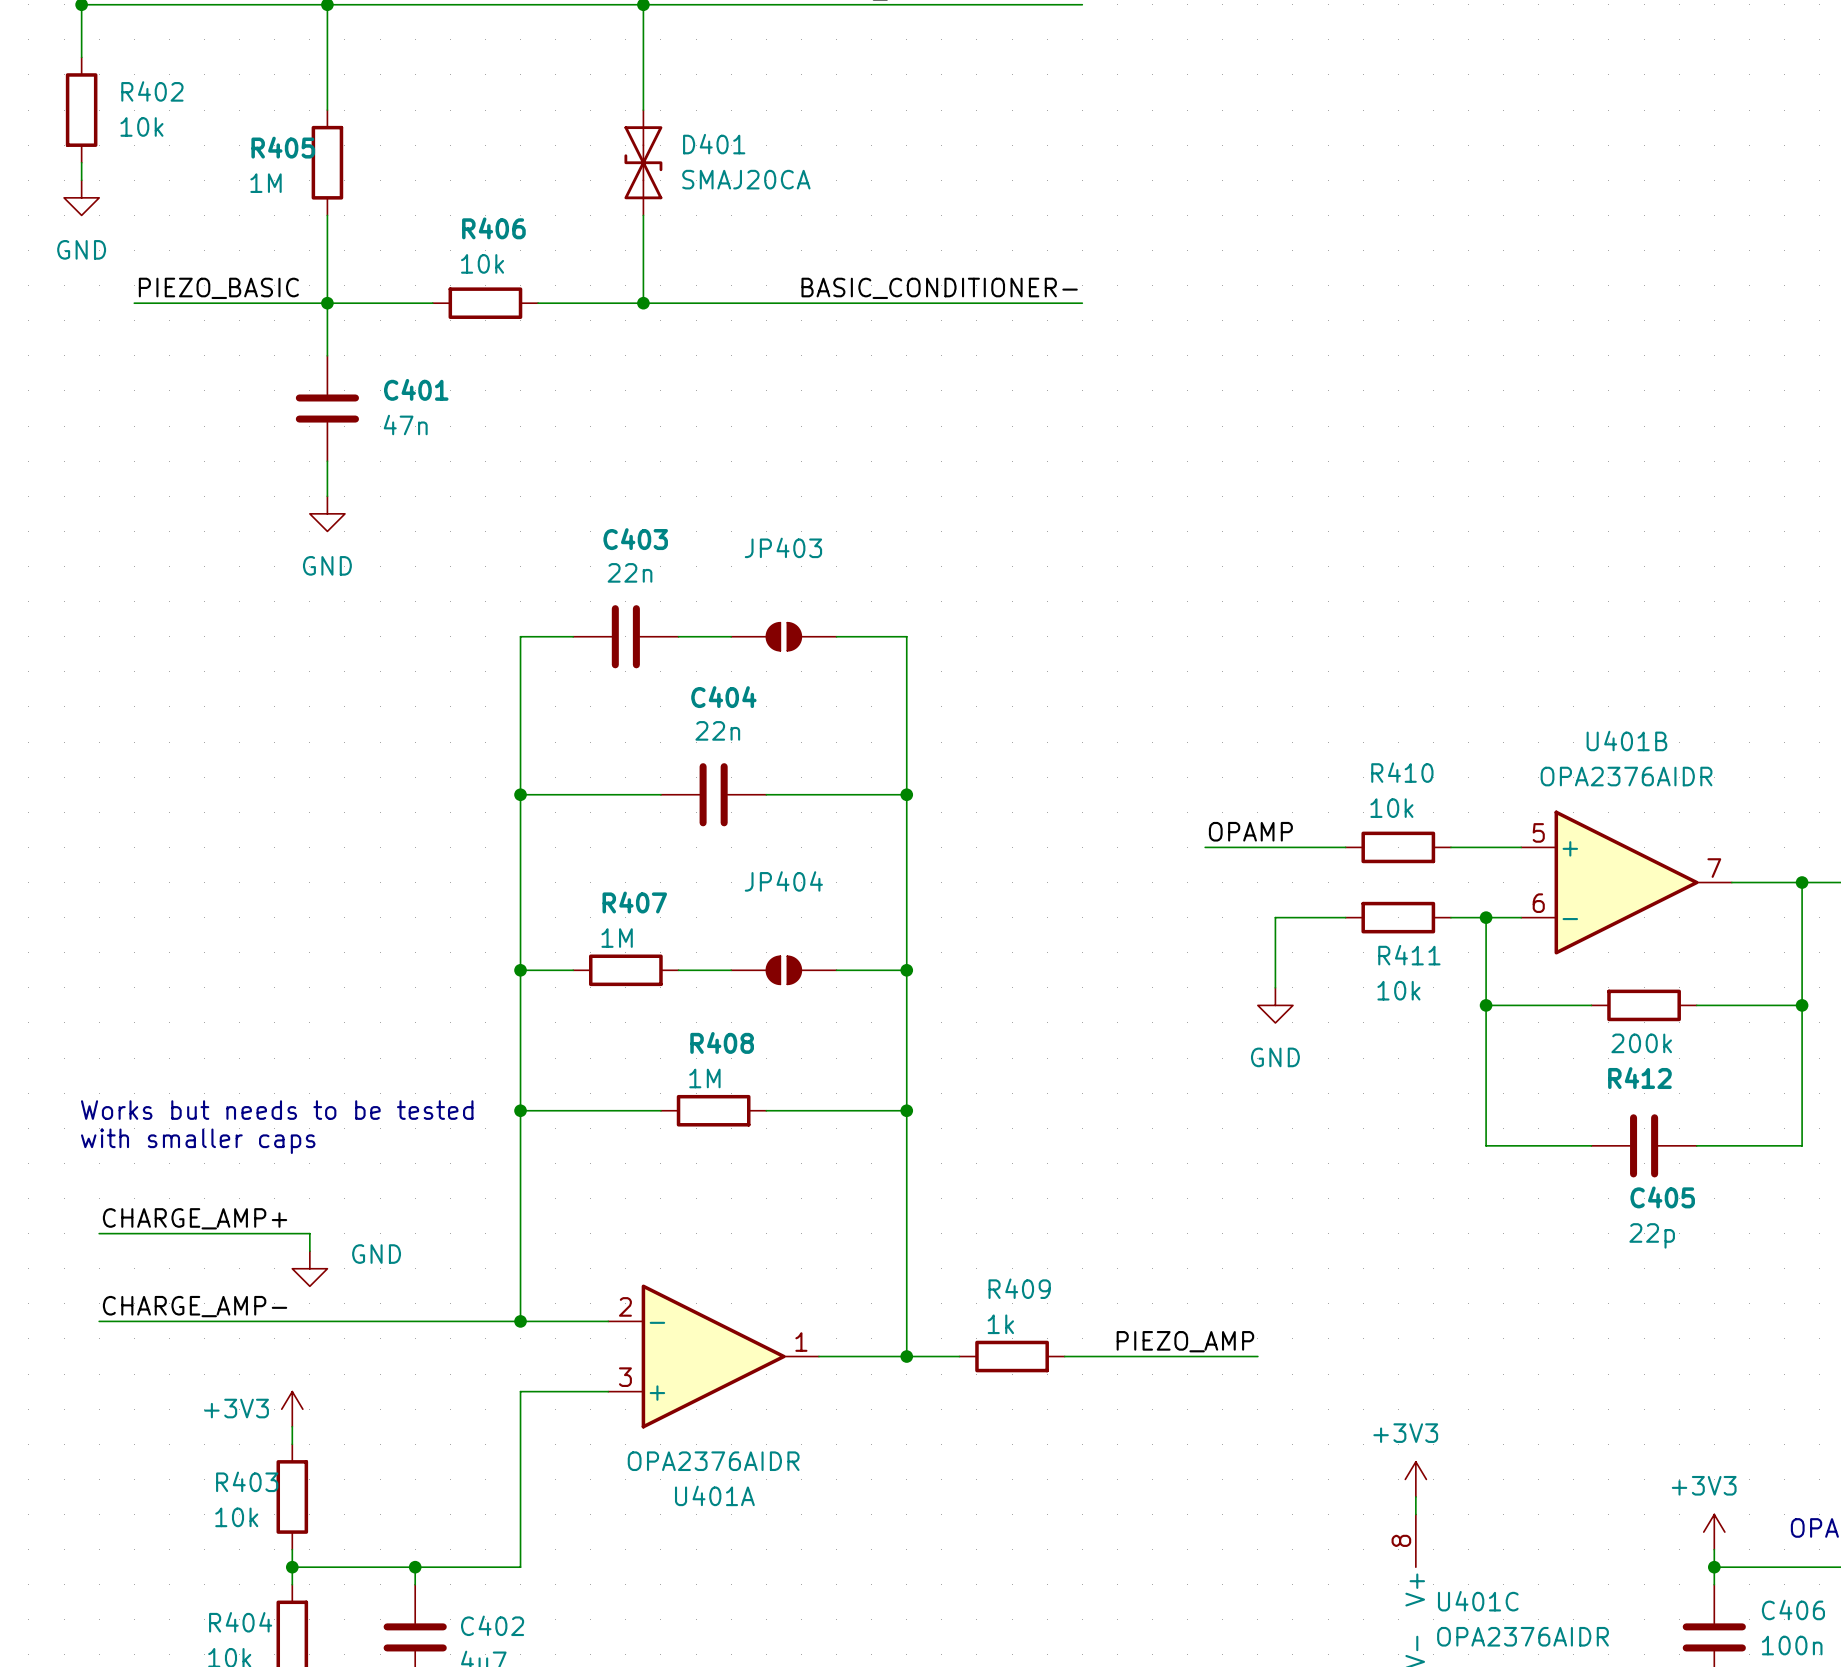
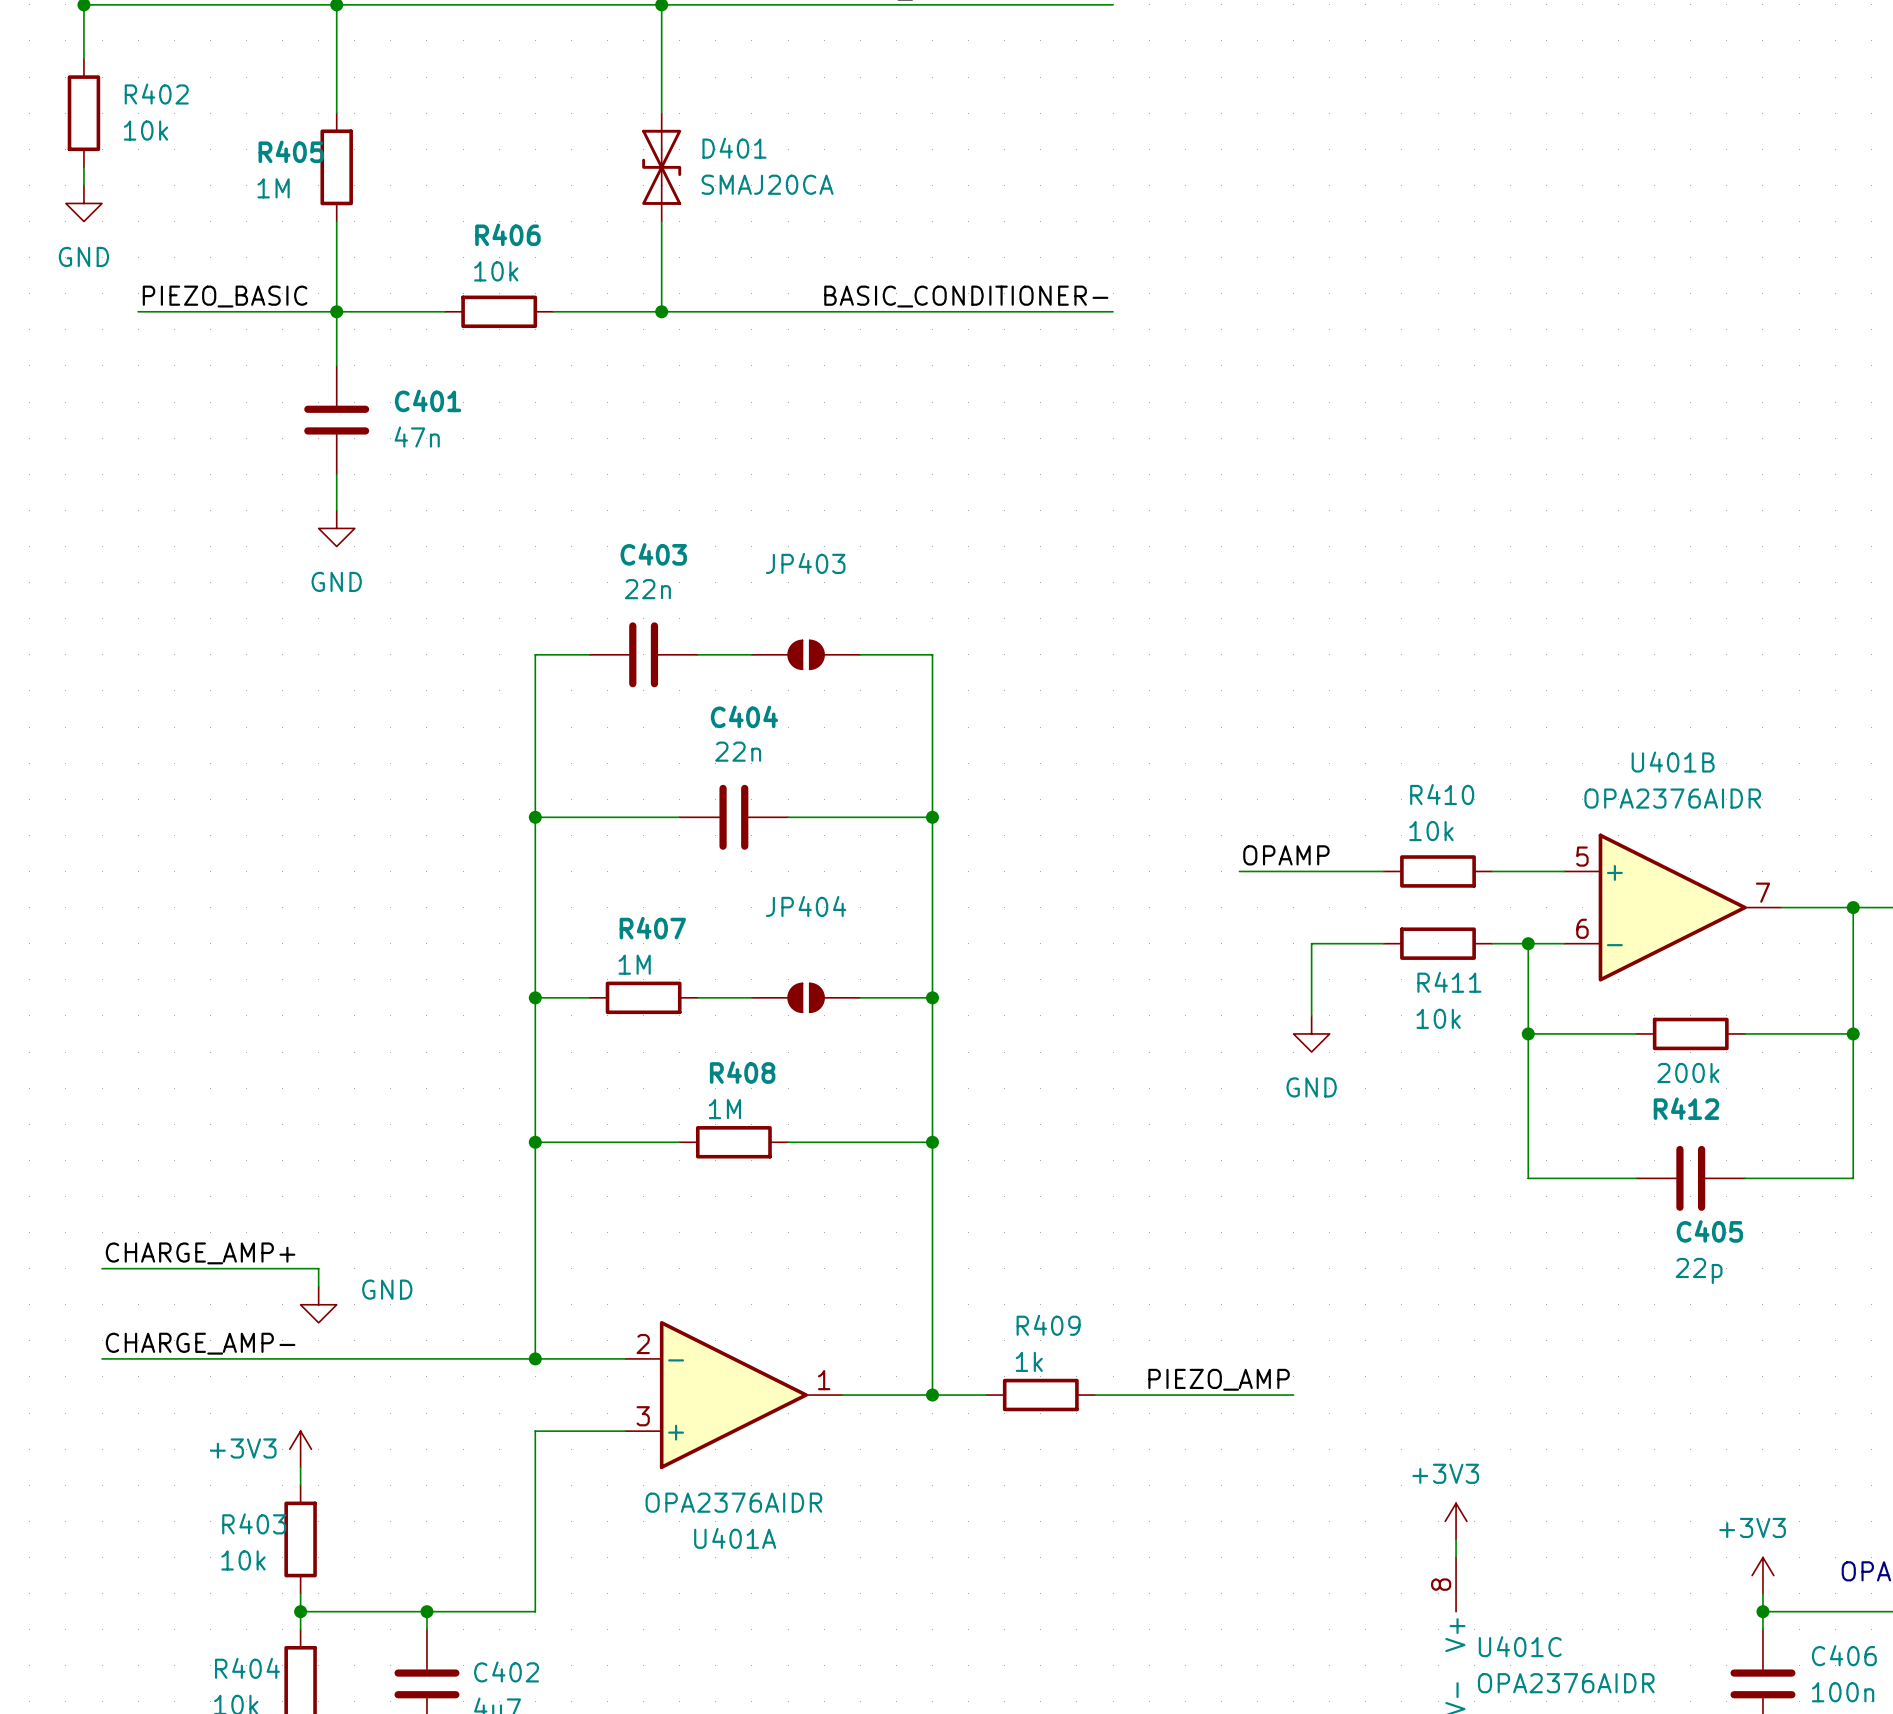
text: Works but needs to be tested (277, 1110) -> none
text: with smaller caps (198, 1141) -> none

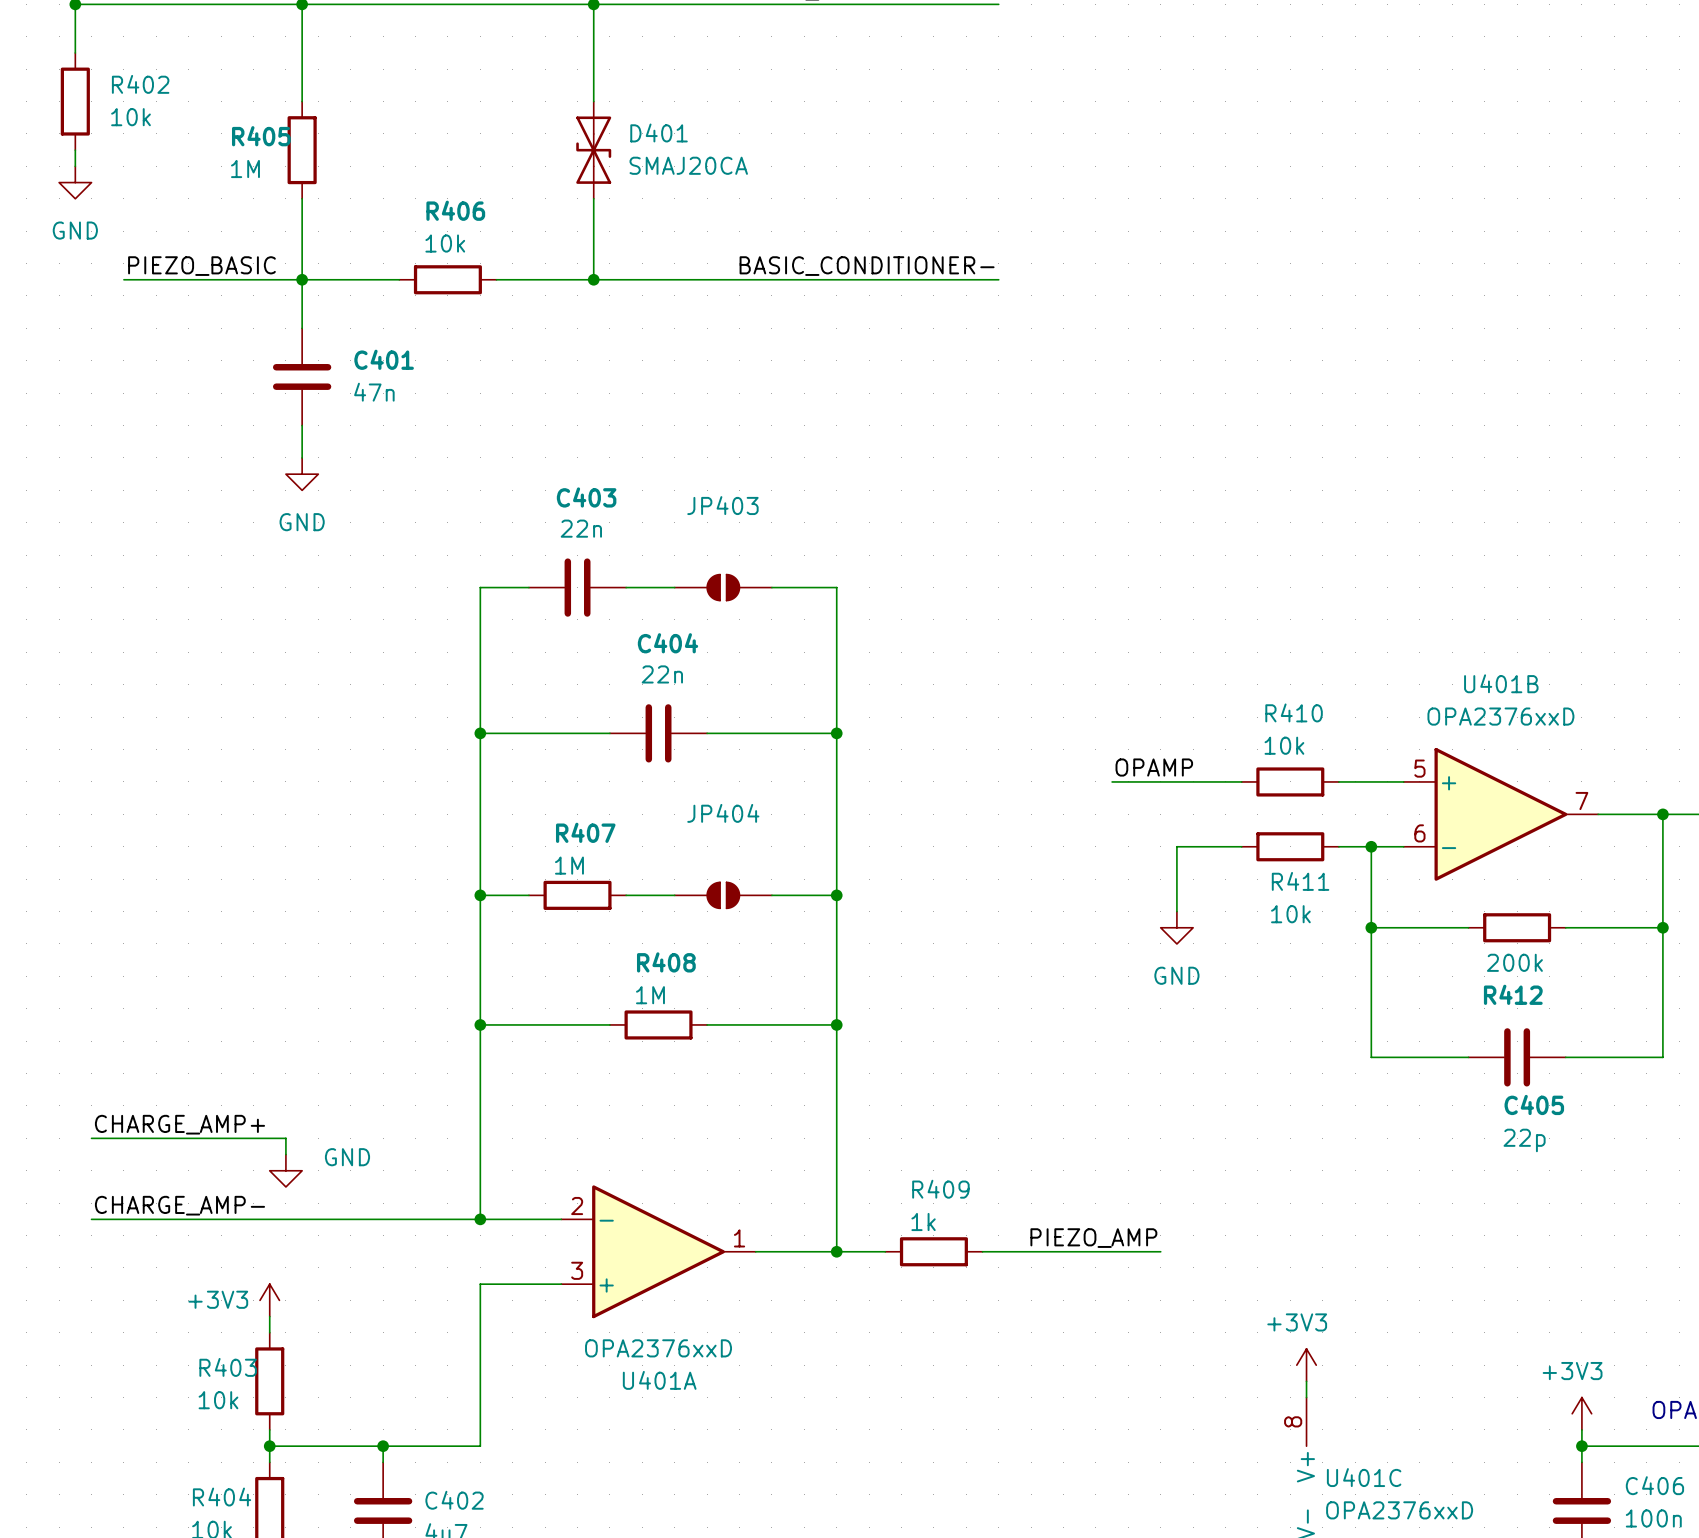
U401B value: OPA2376AIDR (1672, 798) -> OPA2376xxD (1500, 716)
U401A value: OPA2376AIDR (733, 1502) -> OPA2376xxD (658, 1348)
U401C value: OPA2376AIDR (1566, 1683) -> OPA2376xxD (1399, 1510)

